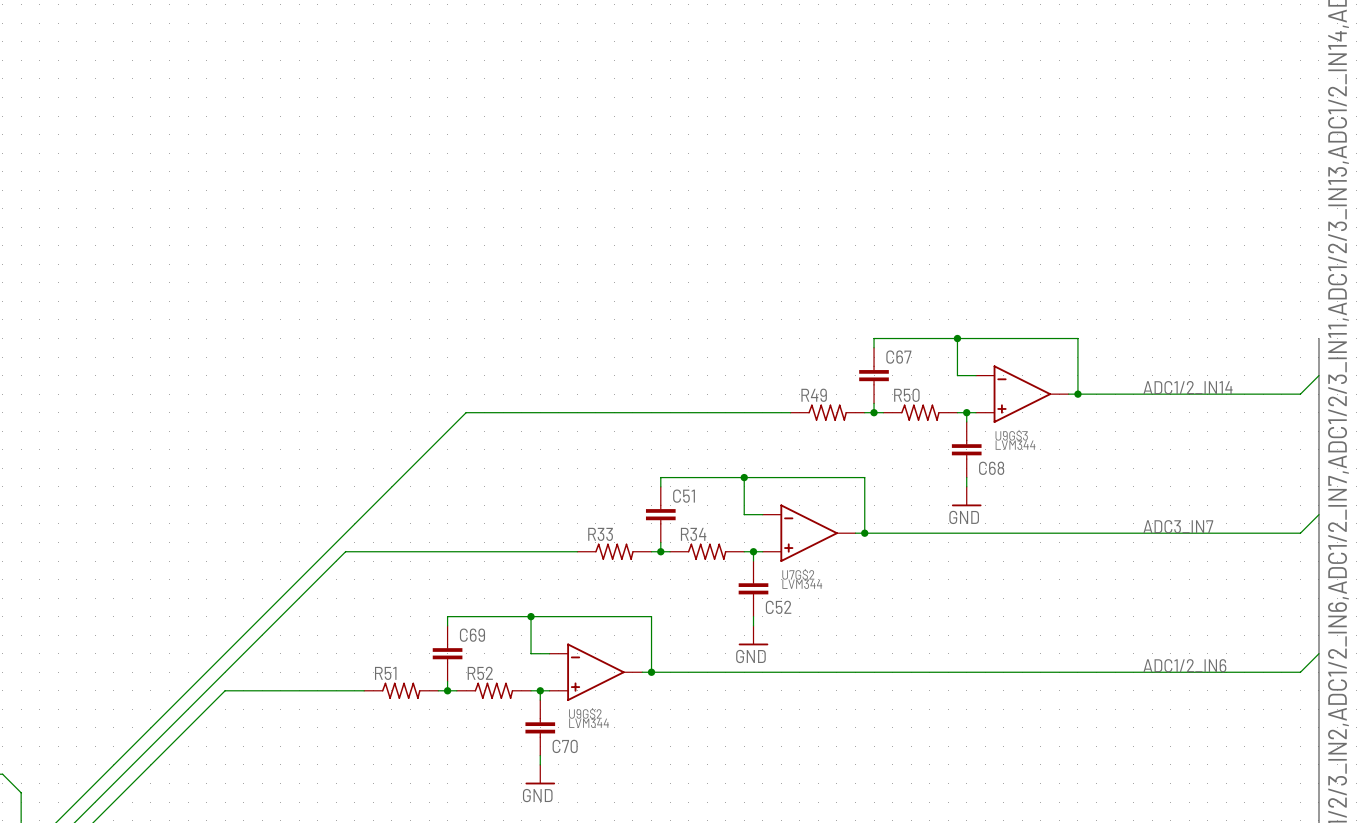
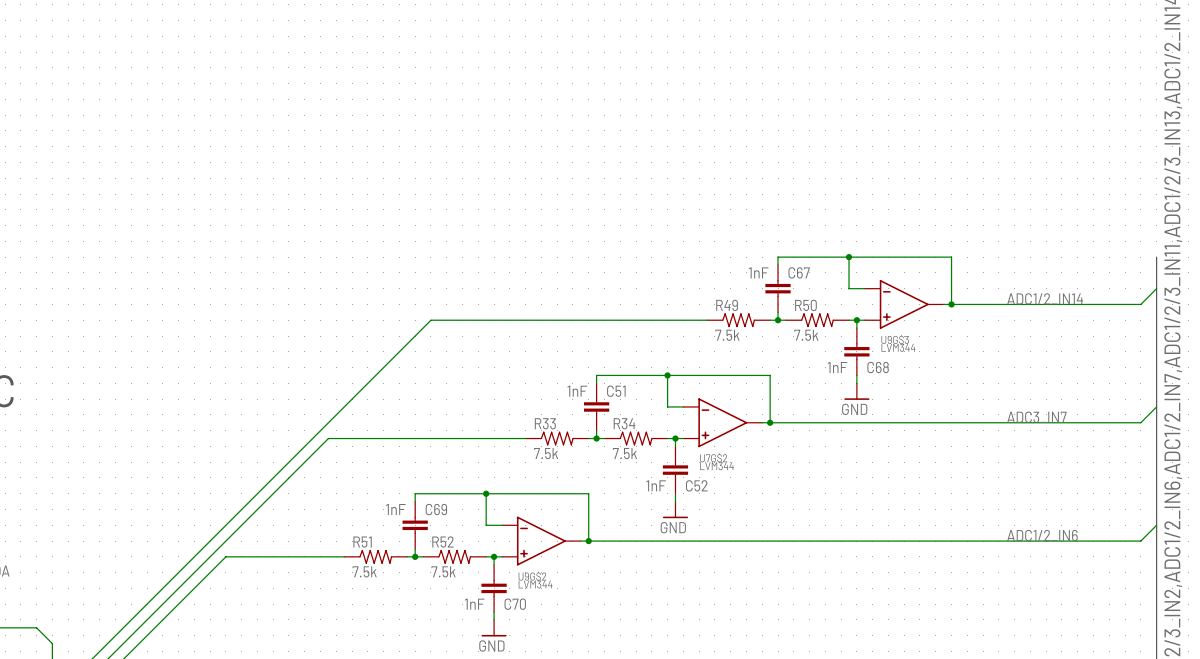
C67 value: none -> 1nF (758, 272)
R49 value: none -> 7.5k (727, 335)
R50 value: none -> 7.5k (806, 335)
C68 value: none -> 1nF (837, 367)
C51 value: none -> 1nF (577, 391)
R33 value: none -> 7.5k (546, 453)
R34 value: none -> 7.5k (624, 453)
C52 value: none -> 1nF (656, 485)
C69 value: none -> 1nF (395, 509)
R51 value: none -> 7.5k (364, 571)
R52 value: none -> 7.5k (443, 571)
C70 value: none -> 1nF (474, 604)

